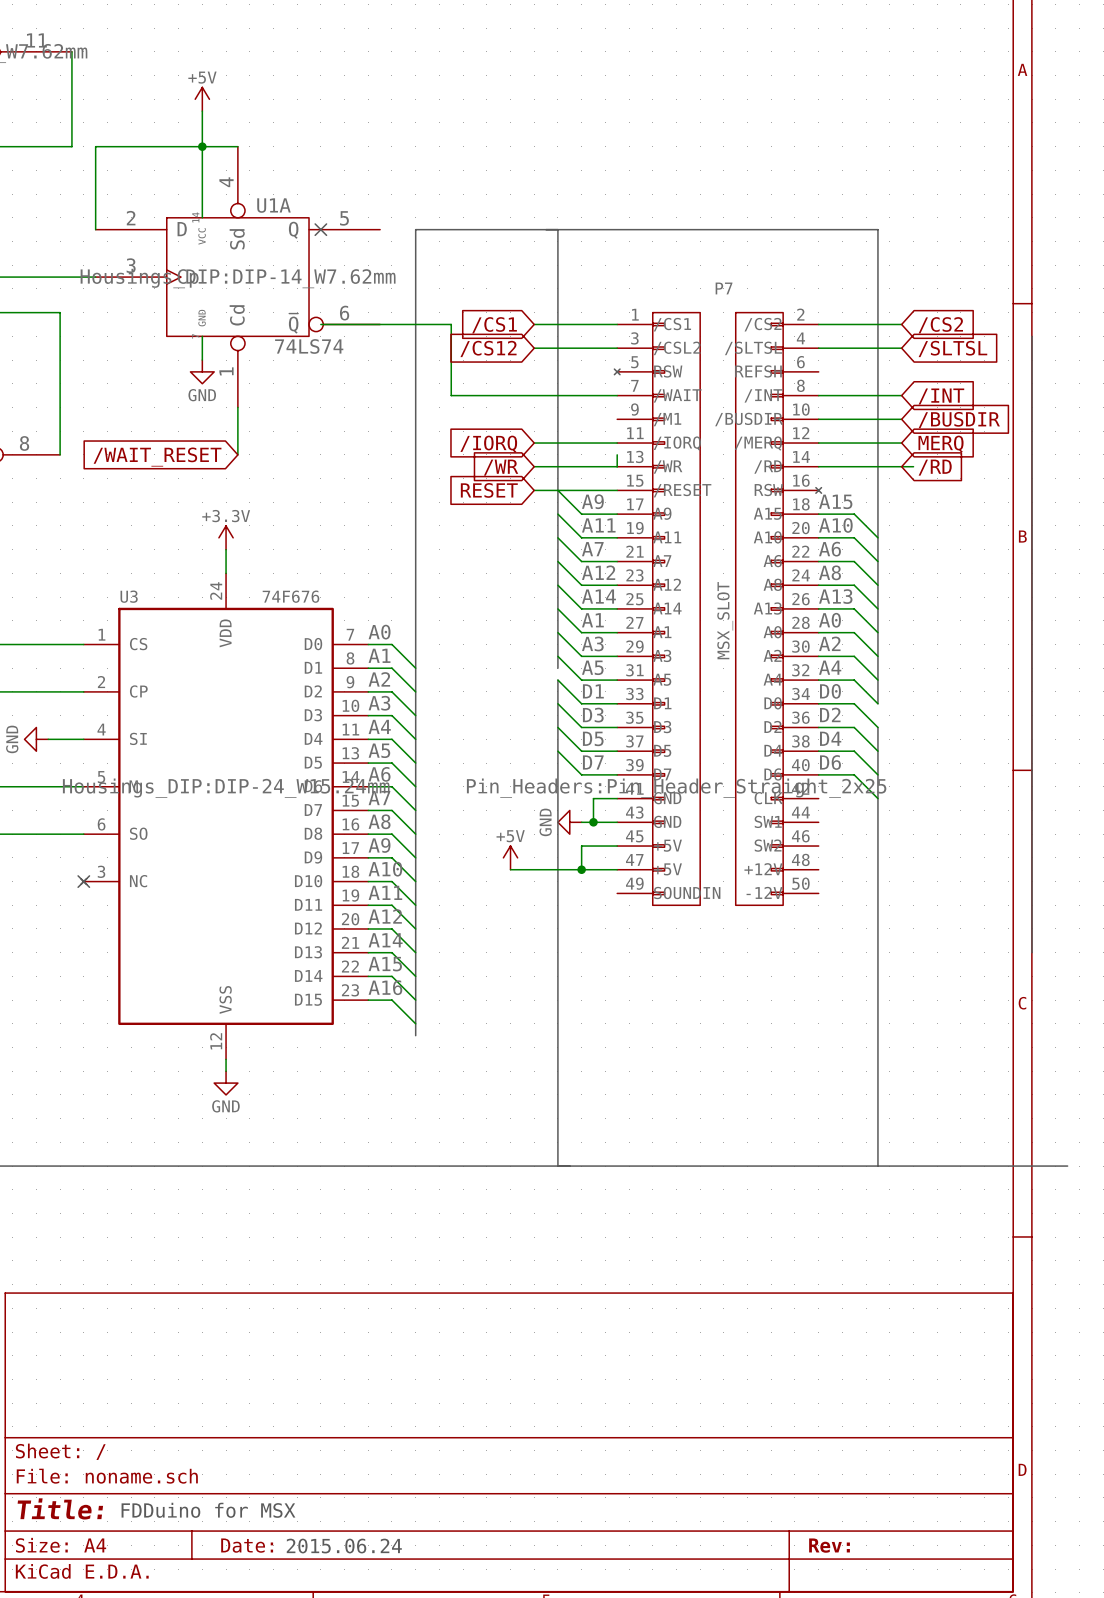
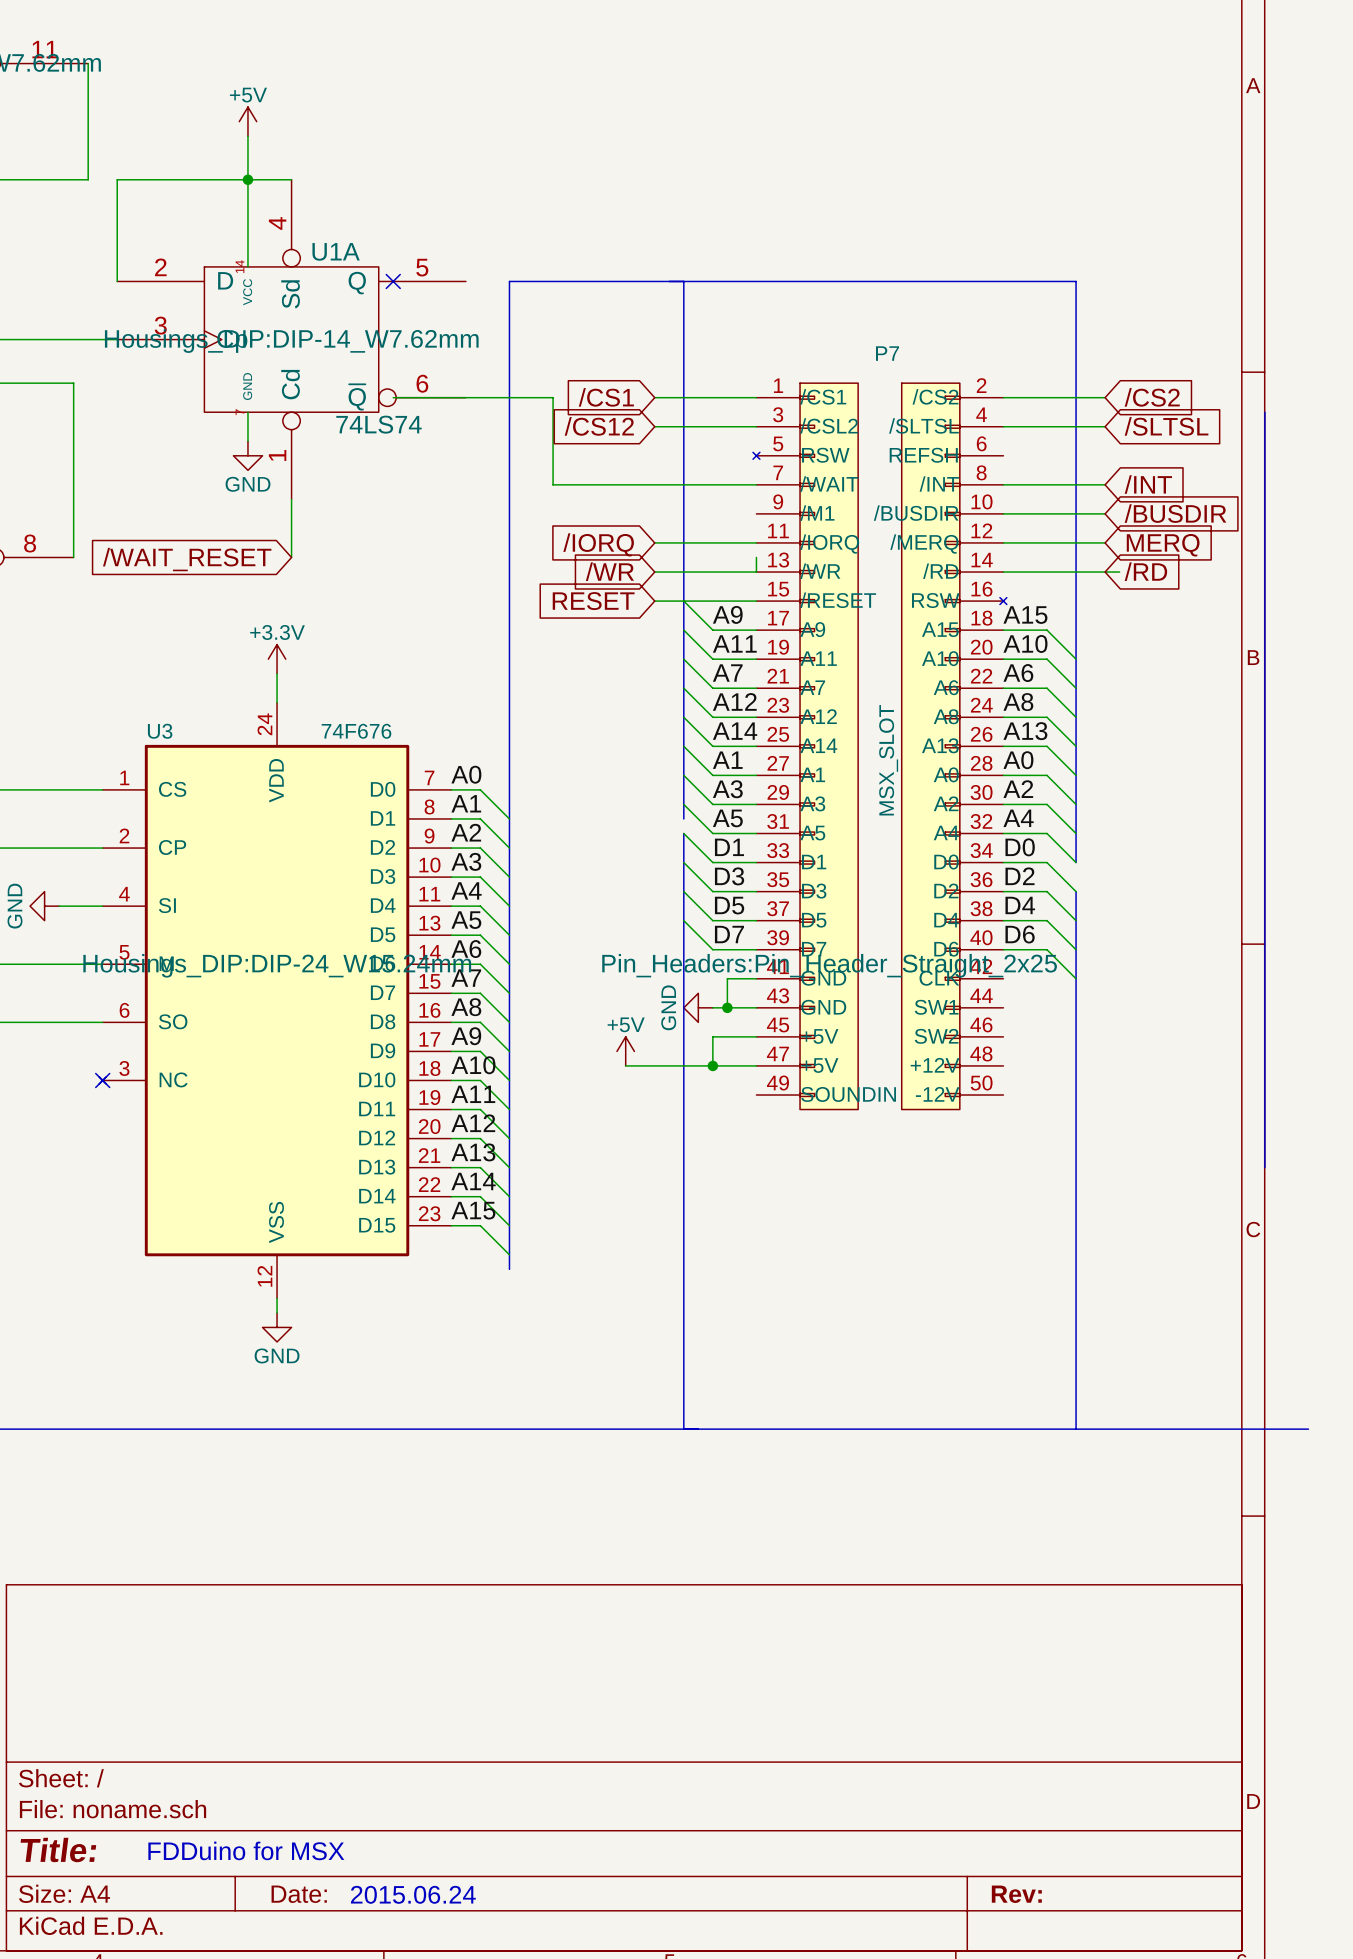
label: A14 (385, 940) -> A13 (473, 1152)
label: A15 (385, 964) -> A14 (473, 1181)
label: A16 (385, 987) -> A15 (473, 1210)

